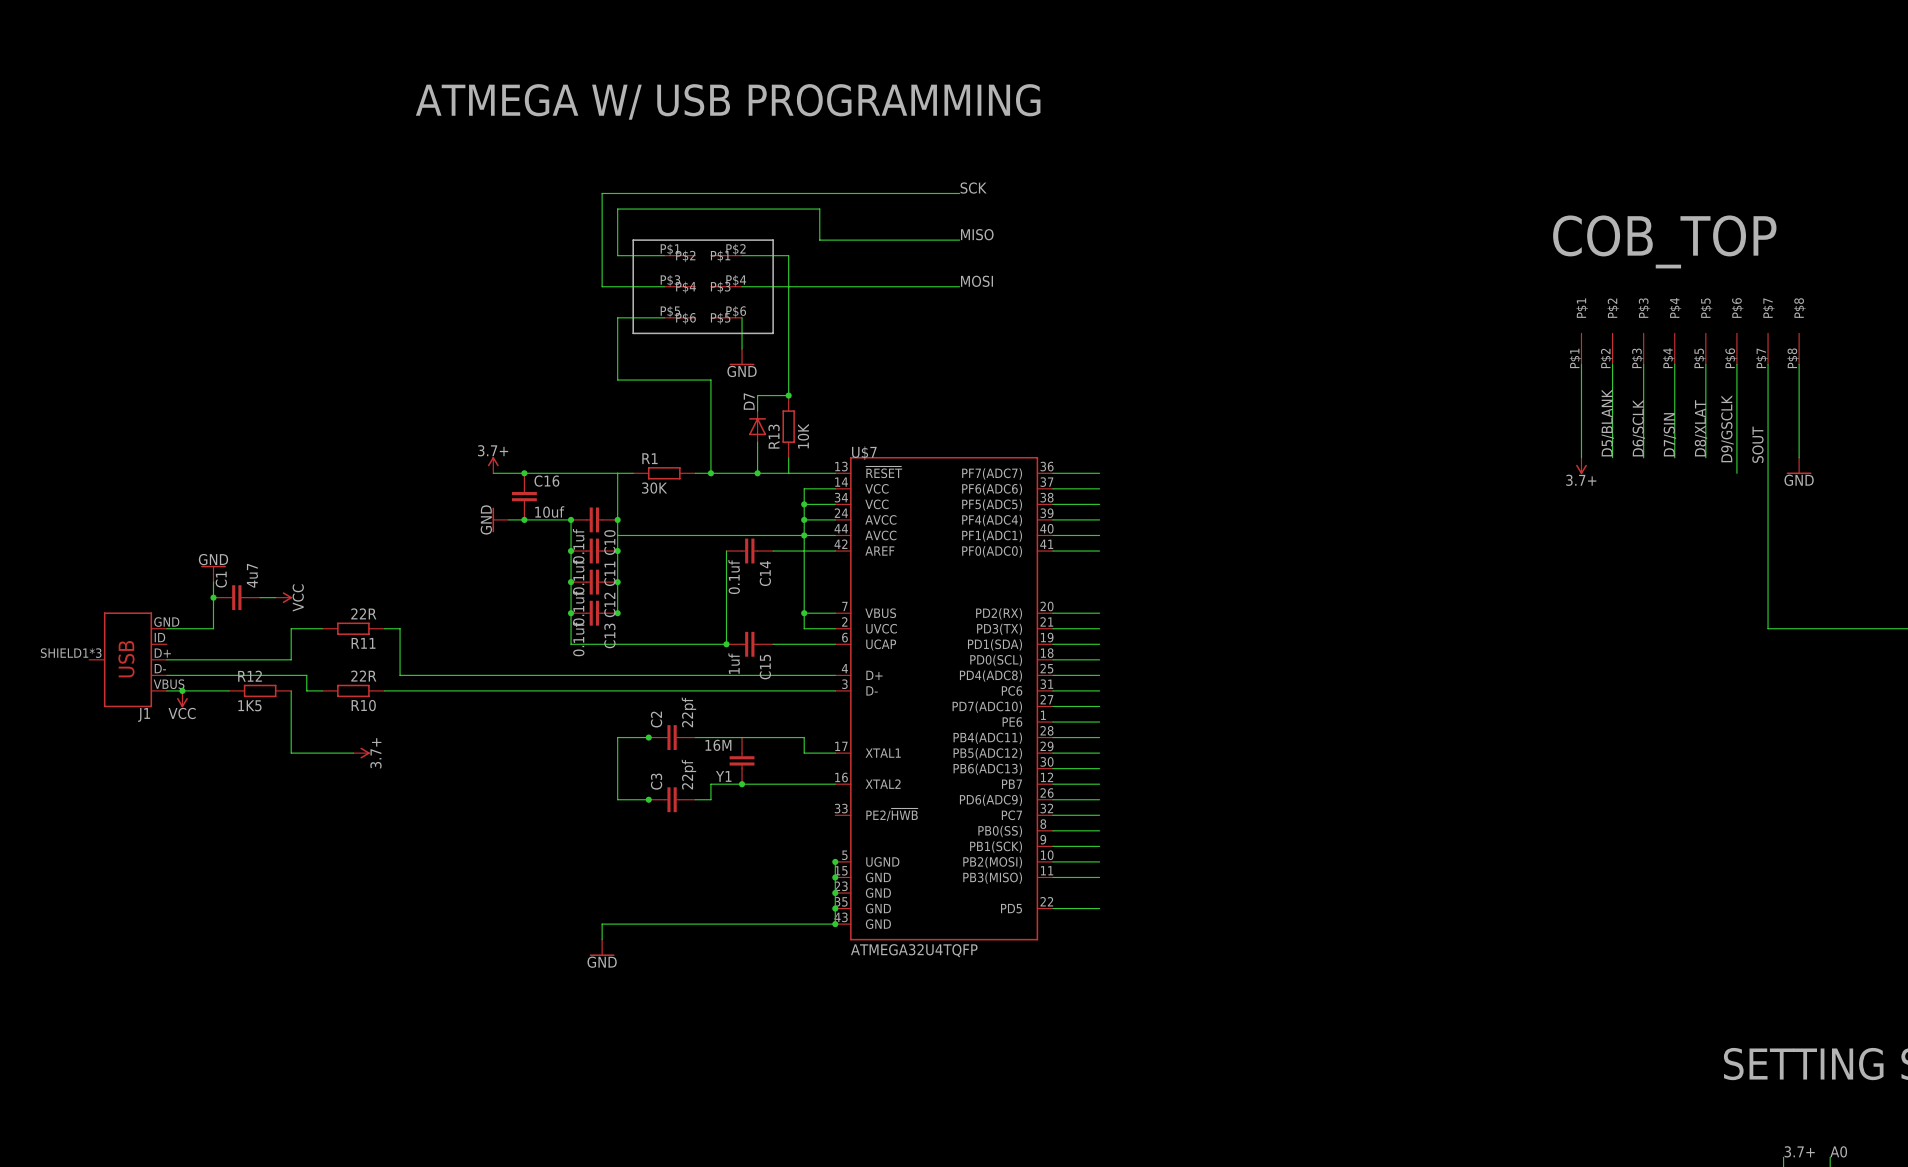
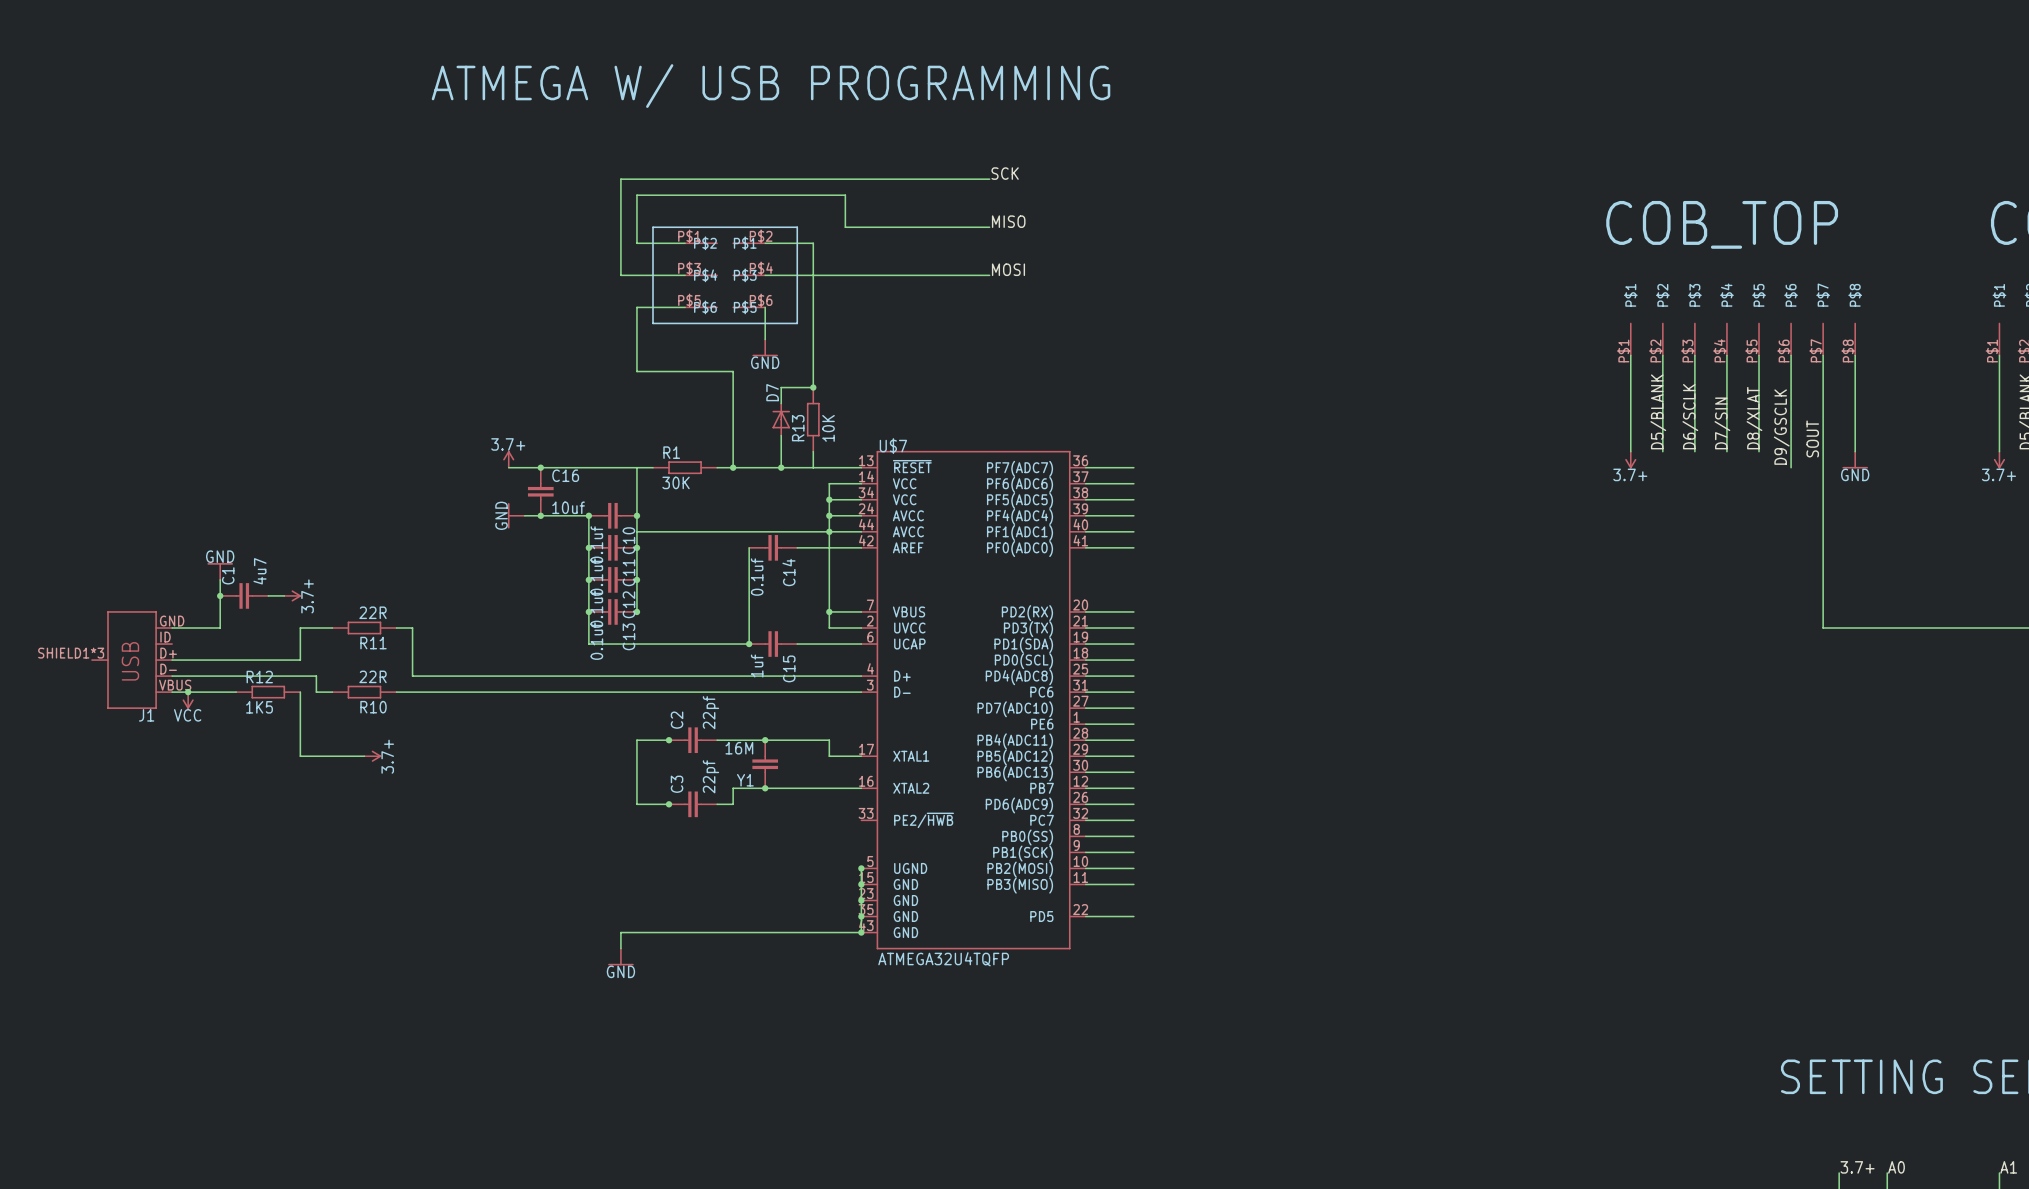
power symbol: VCC (283, 597) -> 3.7+ (292, 595)
junction: none -> (765, 740)

